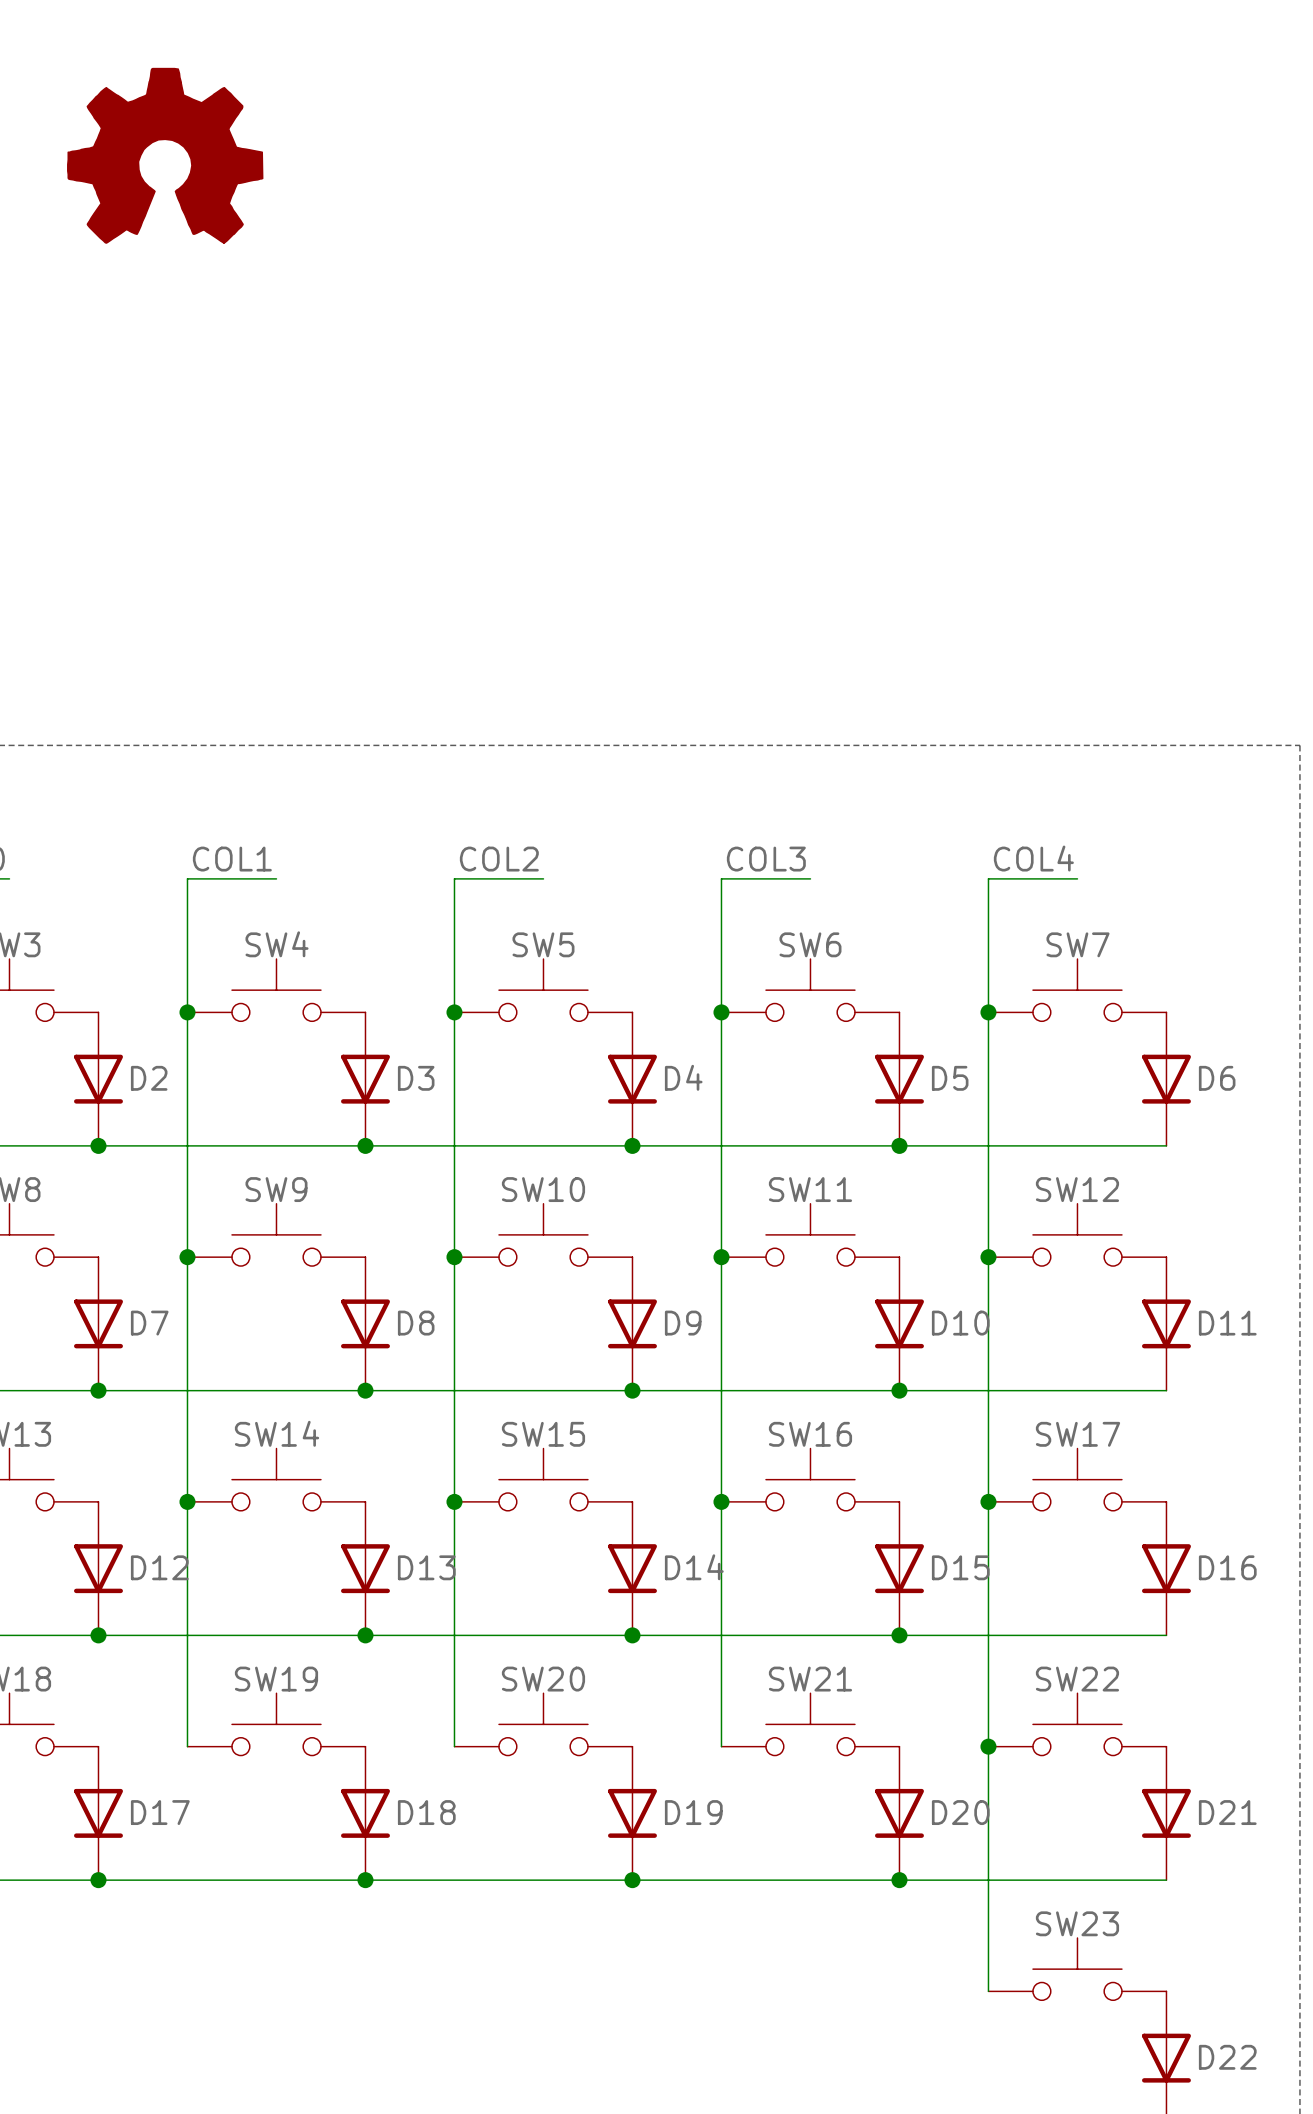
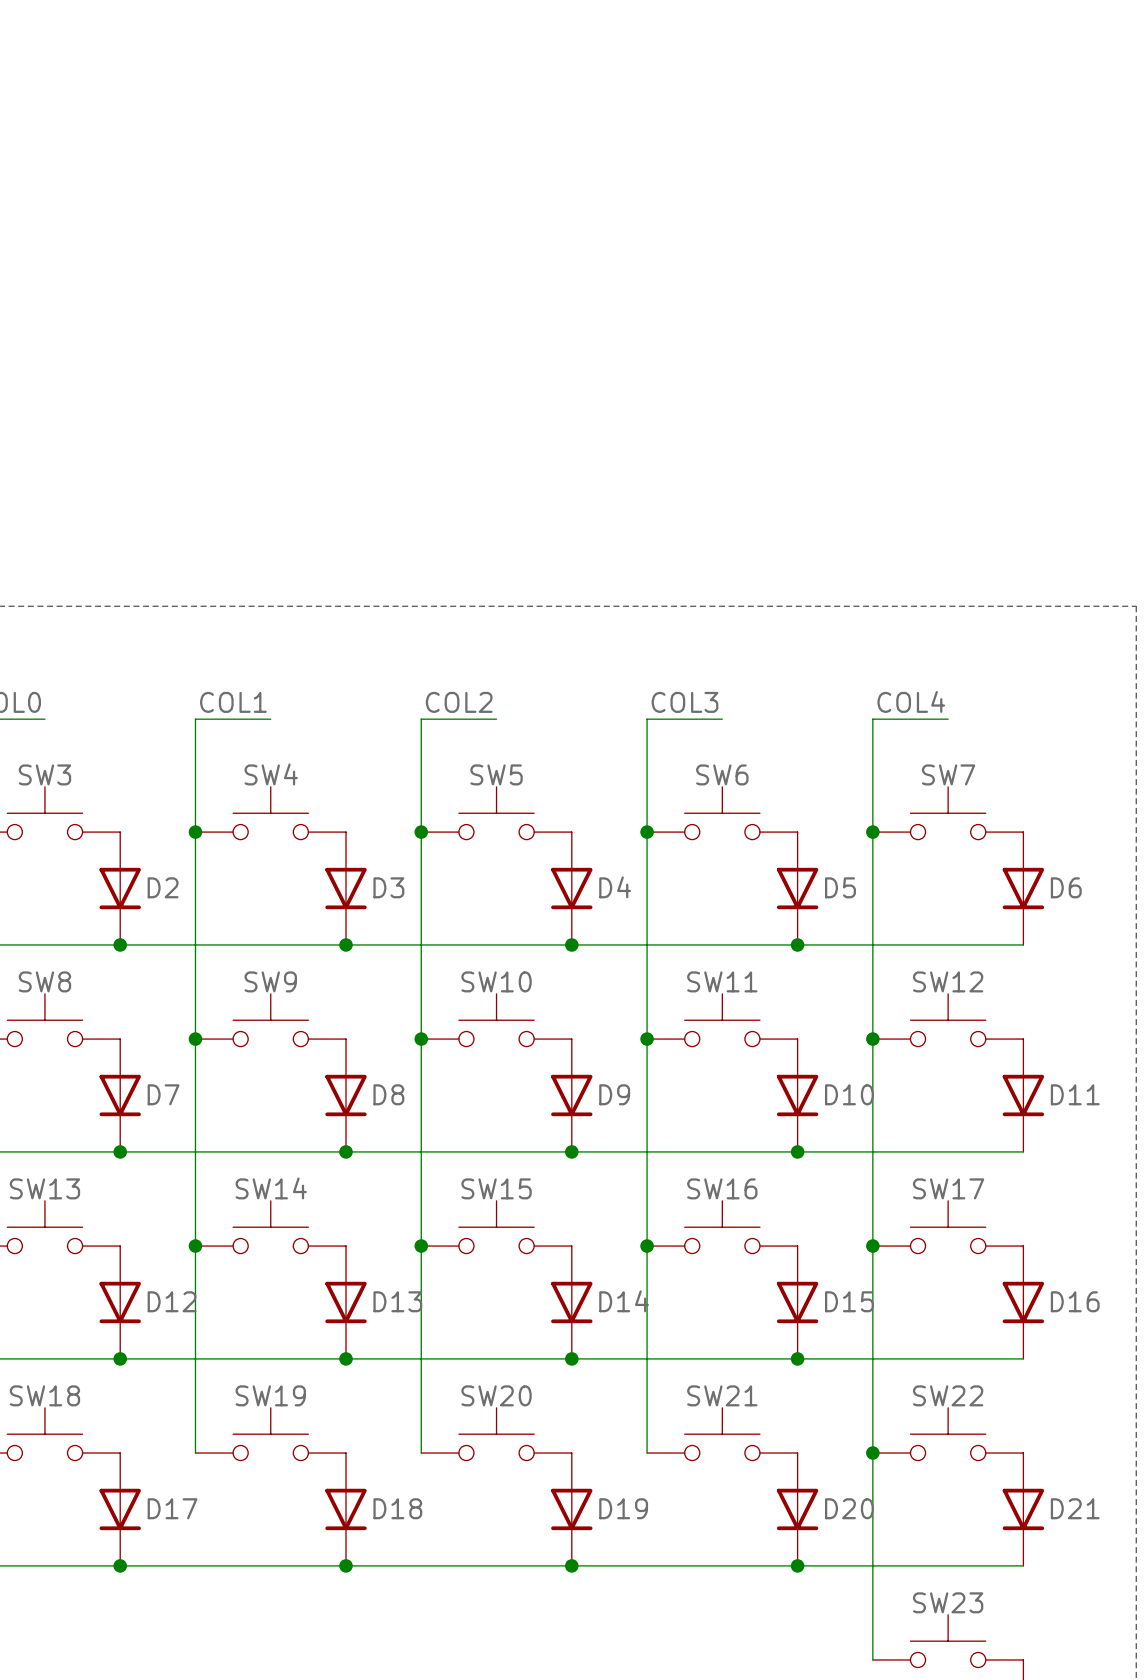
part: (165, 155) -> none

